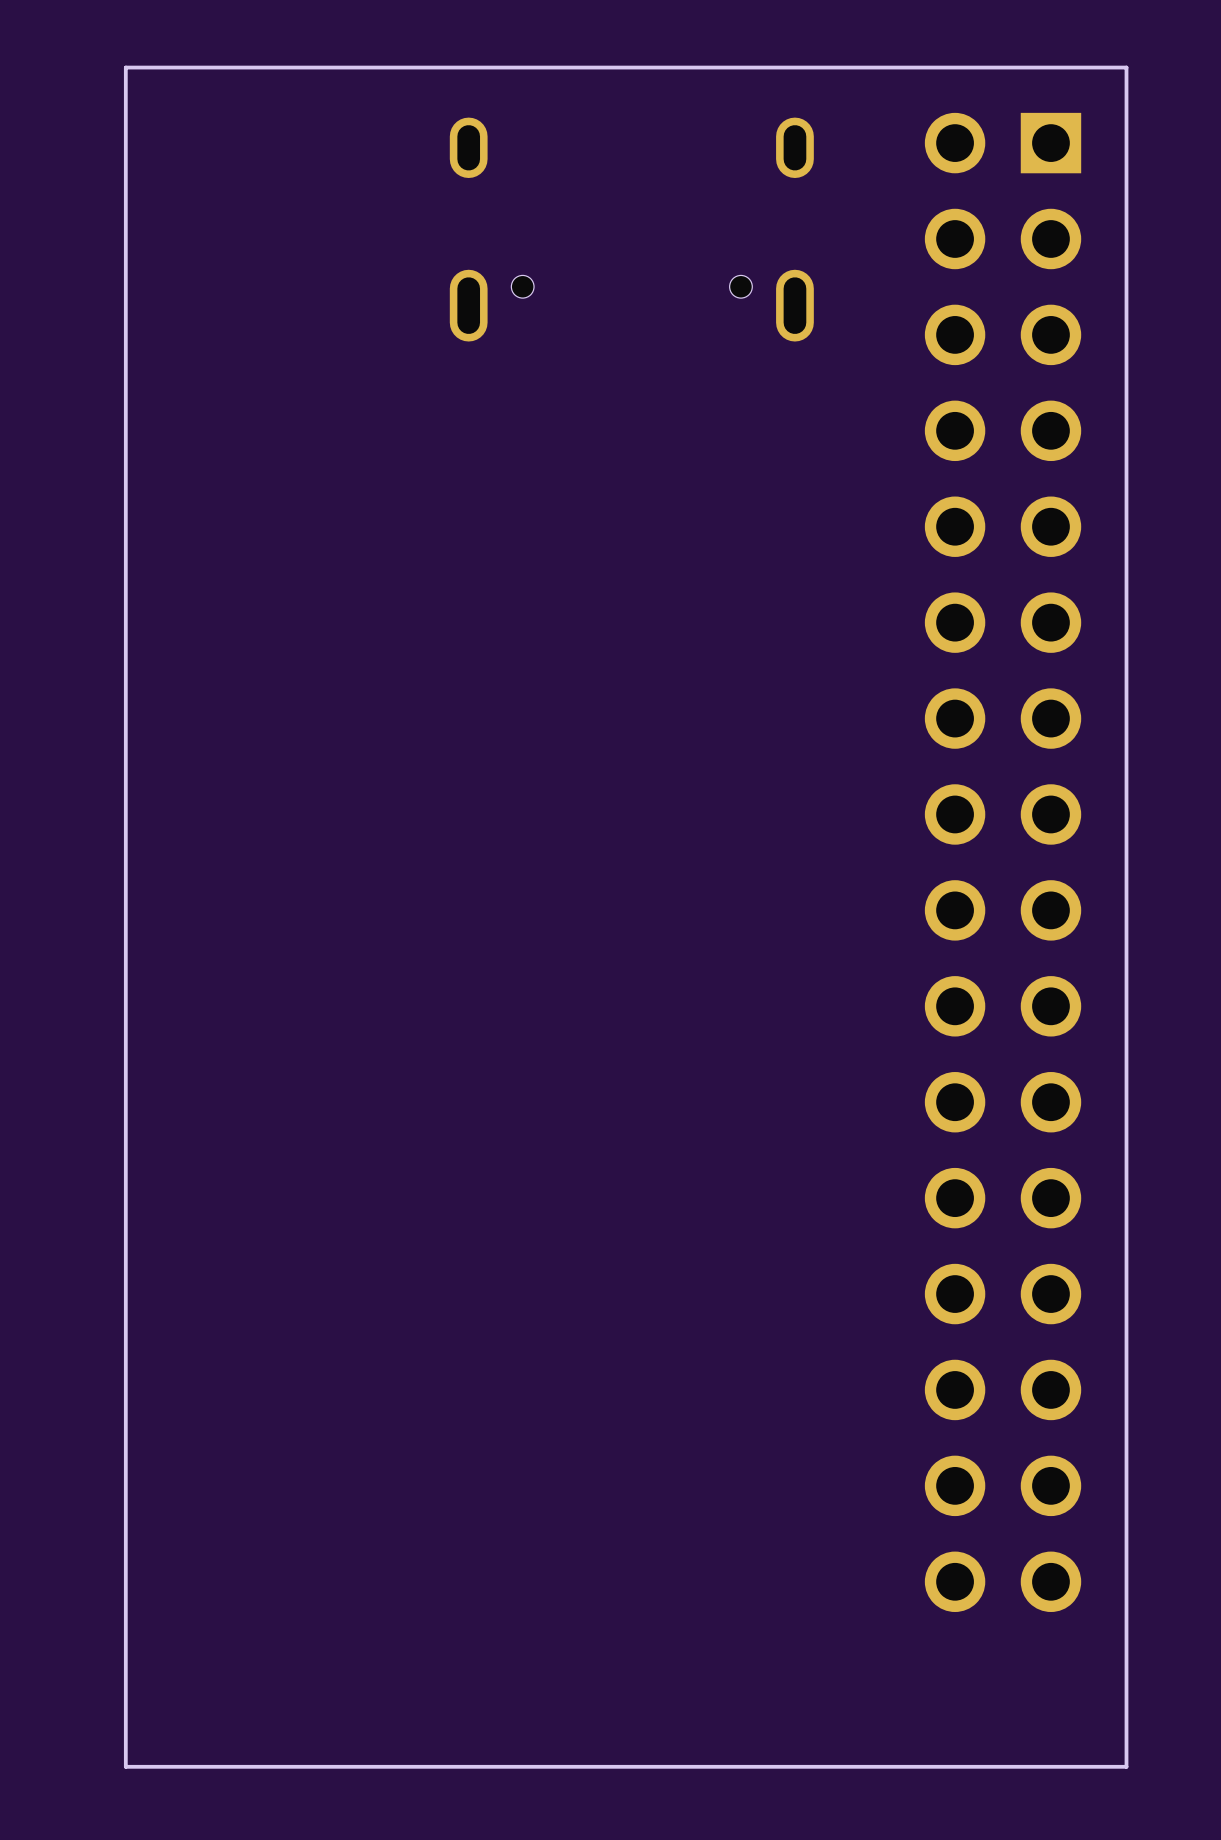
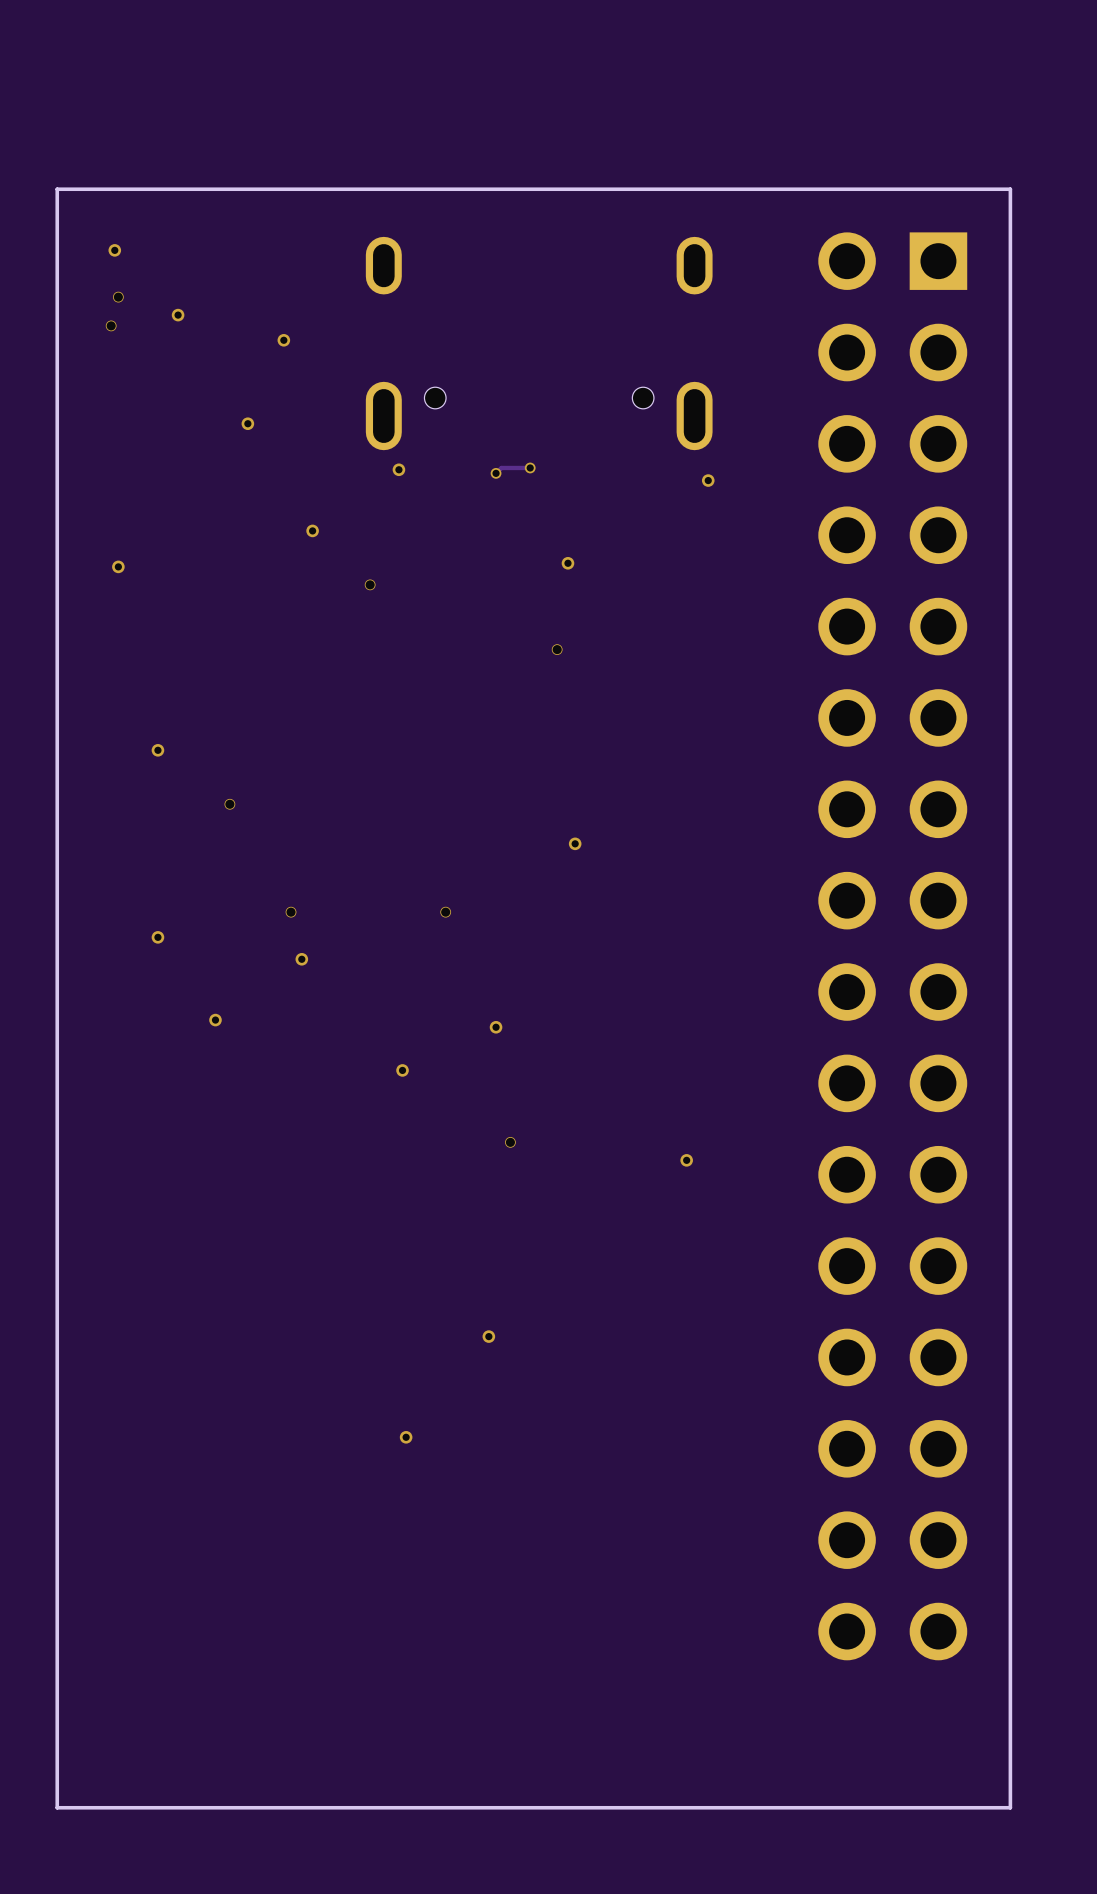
via: none -> (114, 250)
via: none -> (118, 297)
via: none -> (178, 315)
via: none -> (111, 325)
via: none -> (283, 340)
via: none -> (247, 423)
track: none -> (530, 467) (501, 467) (496, 473)
via: none -> (530, 467)
via: none -> (398, 469)
via: none -> (496, 473)
via: none -> (708, 480)
via: none -> (312, 530)
via: none -> (567, 563)
via: none -> (118, 566)
via: none -> (370, 584)
via: none -> (557, 649)
via: none -> (157, 750)
via: none -> (229, 804)
via: none -> (575, 843)
via: none -> (291, 912)
via: none -> (445, 912)
via: none -> (157, 937)
via: none -> (301, 959)
via: none -> (215, 1020)
via: none -> (496, 1027)
via: none -> (402, 1070)
via: none -> (510, 1142)
via: none -> (686, 1160)
via: none -> (488, 1336)
via: none -> (406, 1437)

